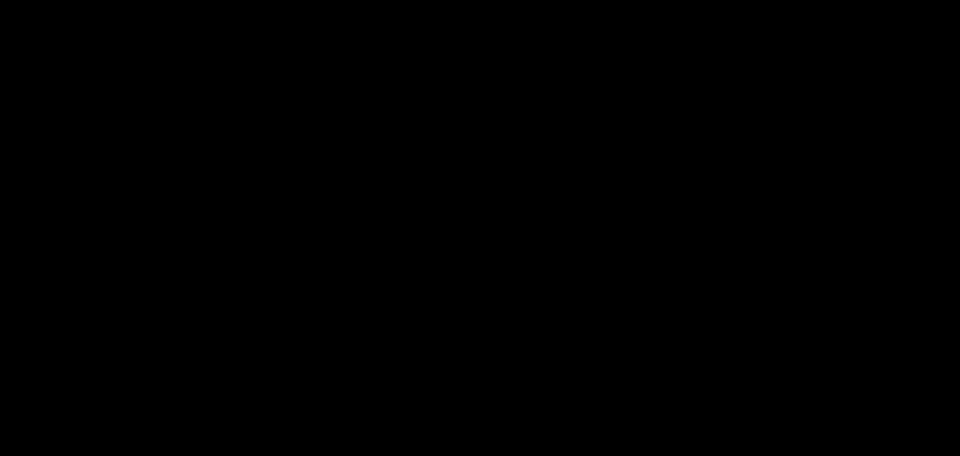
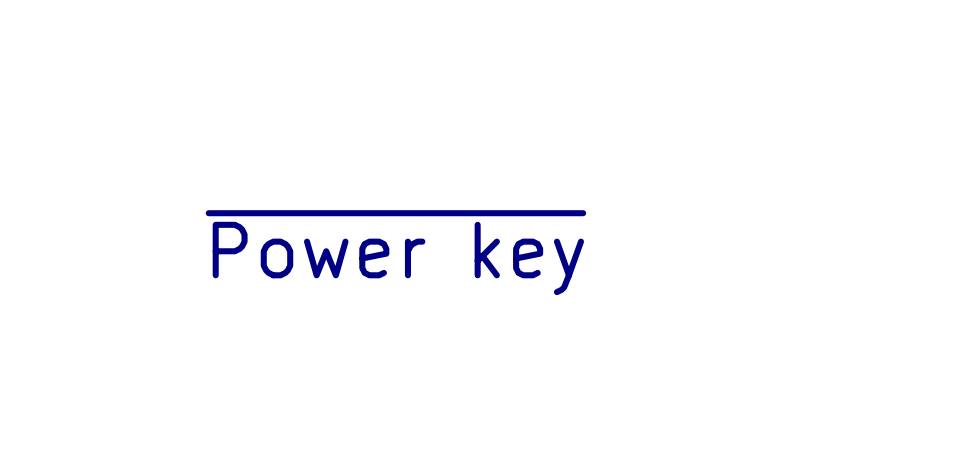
text: none -> ~{Power key} (395, 252)

